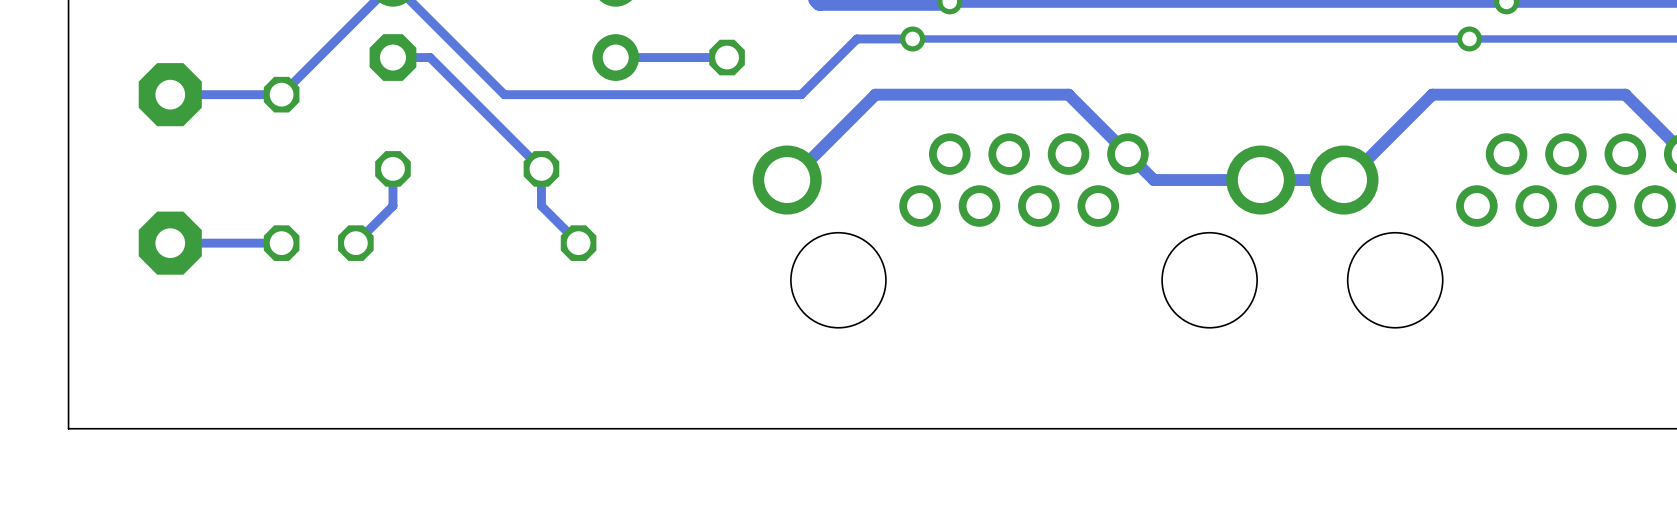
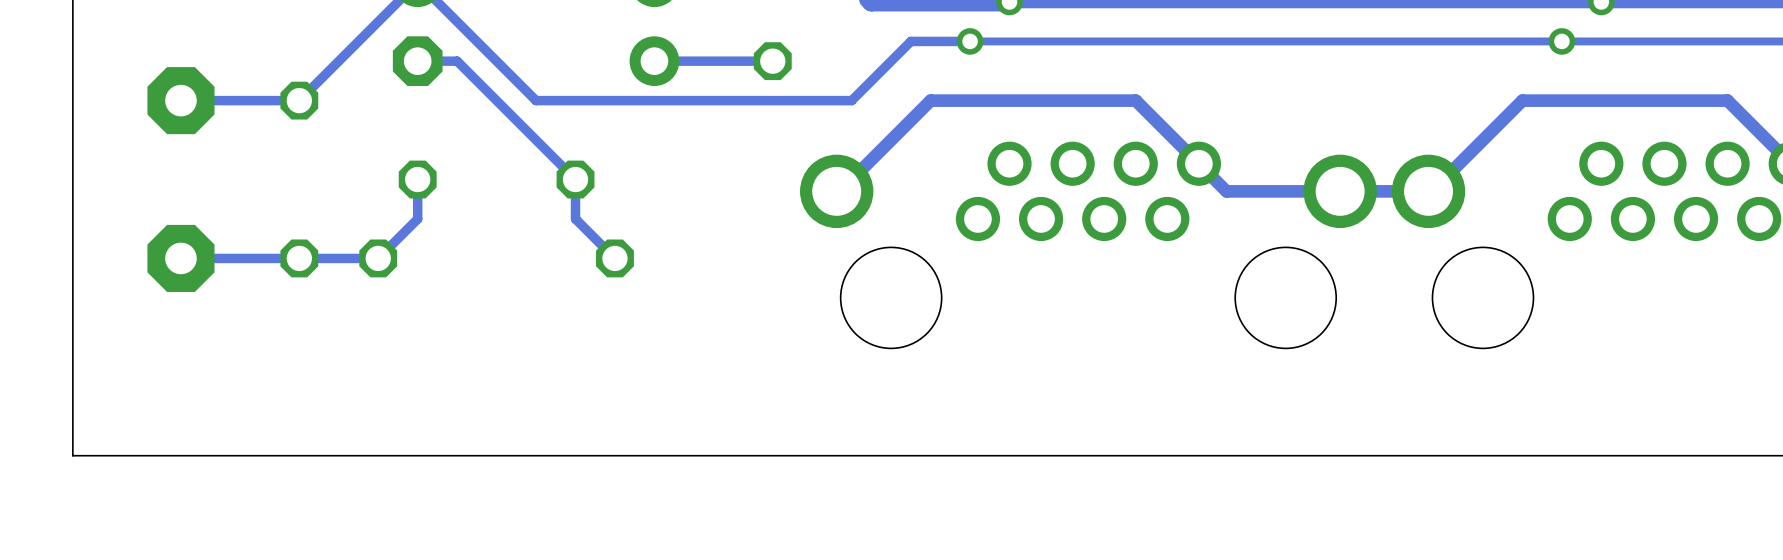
track: none -> (378, 258) (299, 258)

